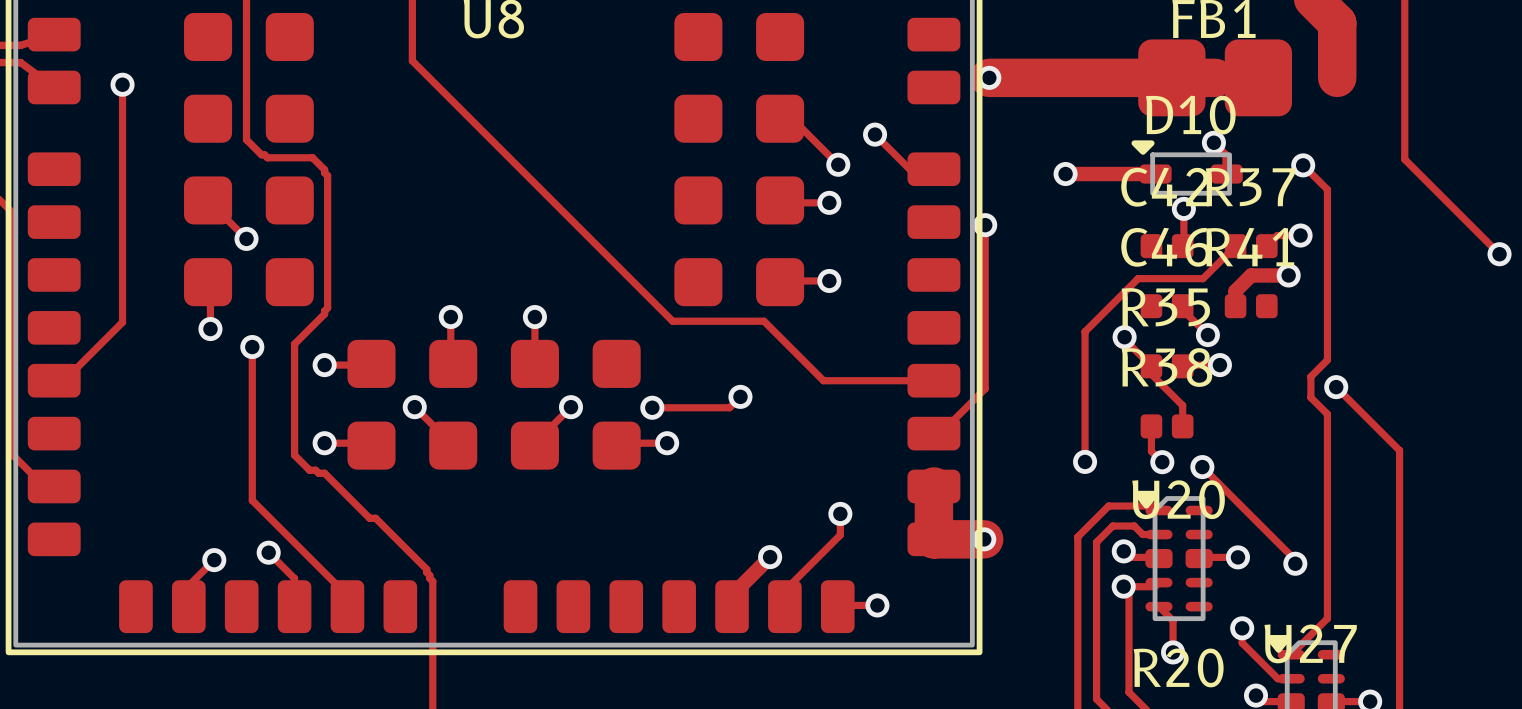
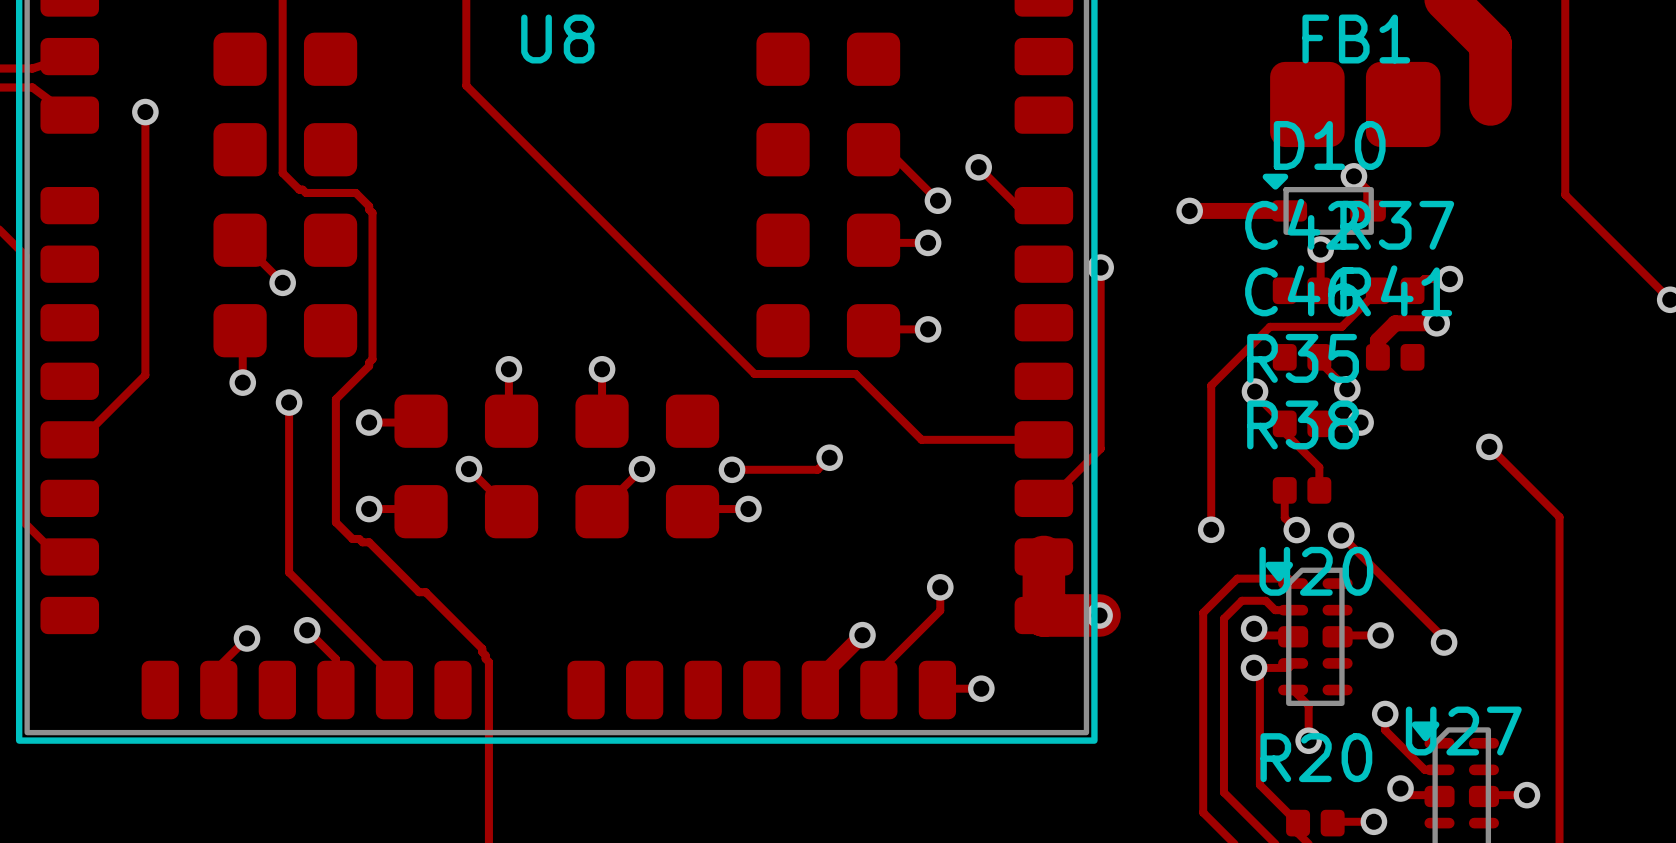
track: (989, 77) (1215, 77) -> none
via: (989, 77) -> none
track: (1303, 165) (1327, 189) (1327, 360) (1310, 376) (1310, 397) (1327, 414) (1327, 618) (1291, 654) -> none
via: (1303, 165) -> none

